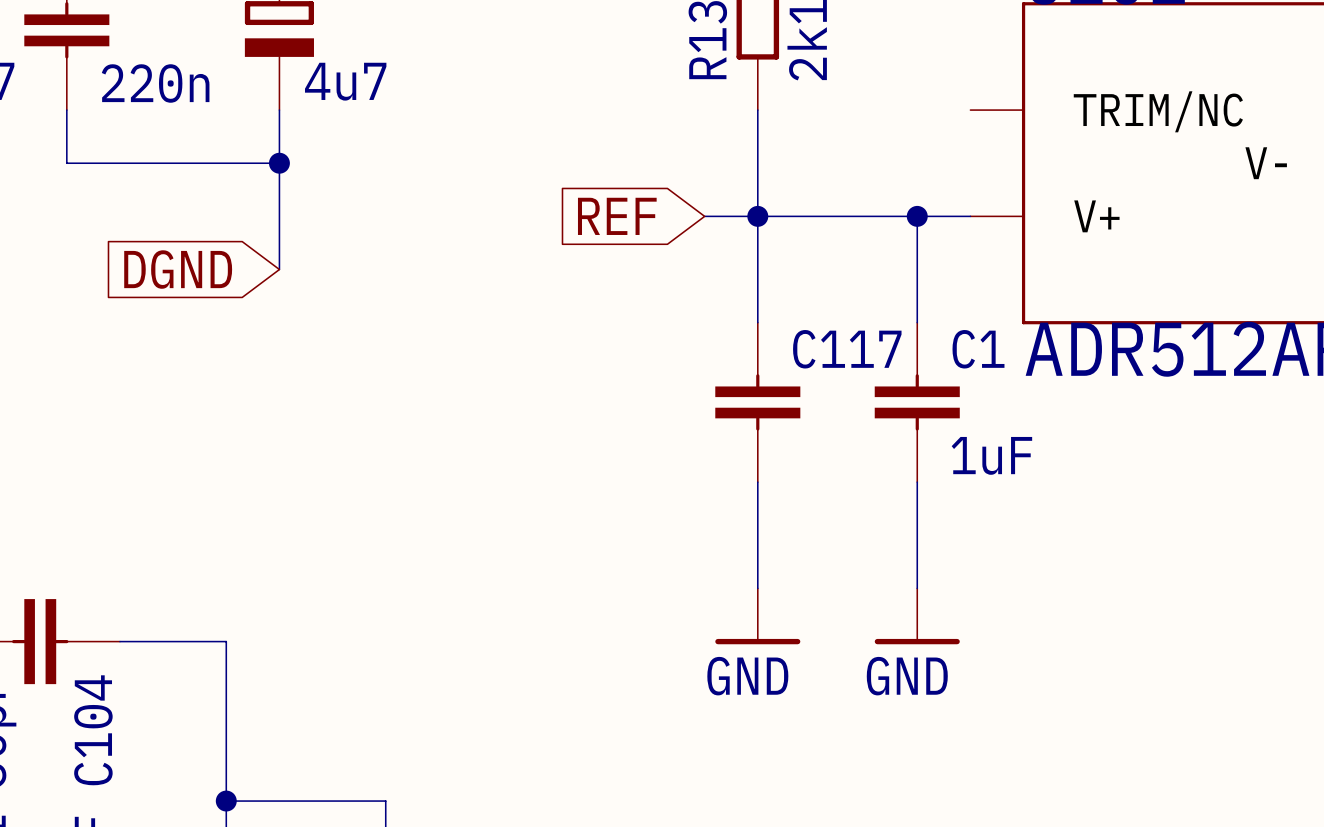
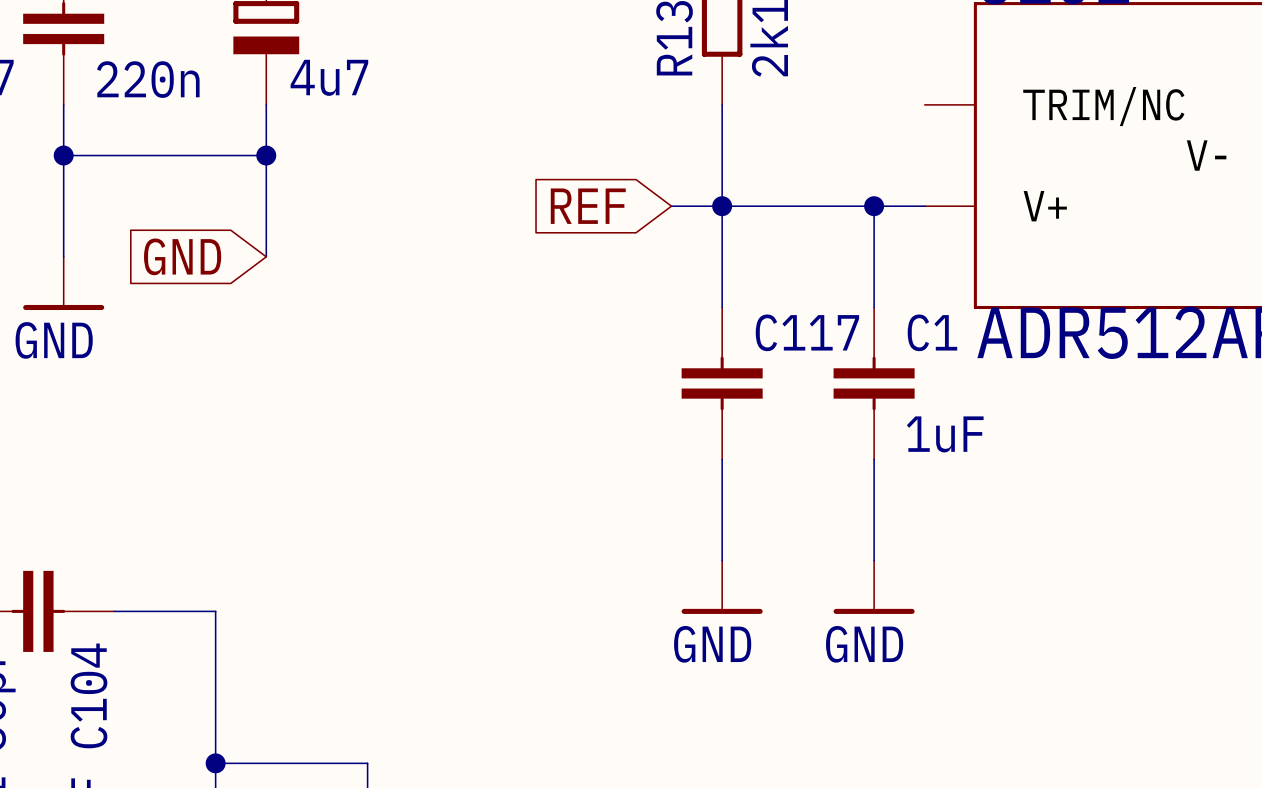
wire: none -> (63, 155) (63, 256)
junction: none -> (63, 155)
global label: DGND (178, 269) -> GND (182, 256)
power symbol: none -> GND (63, 283)

